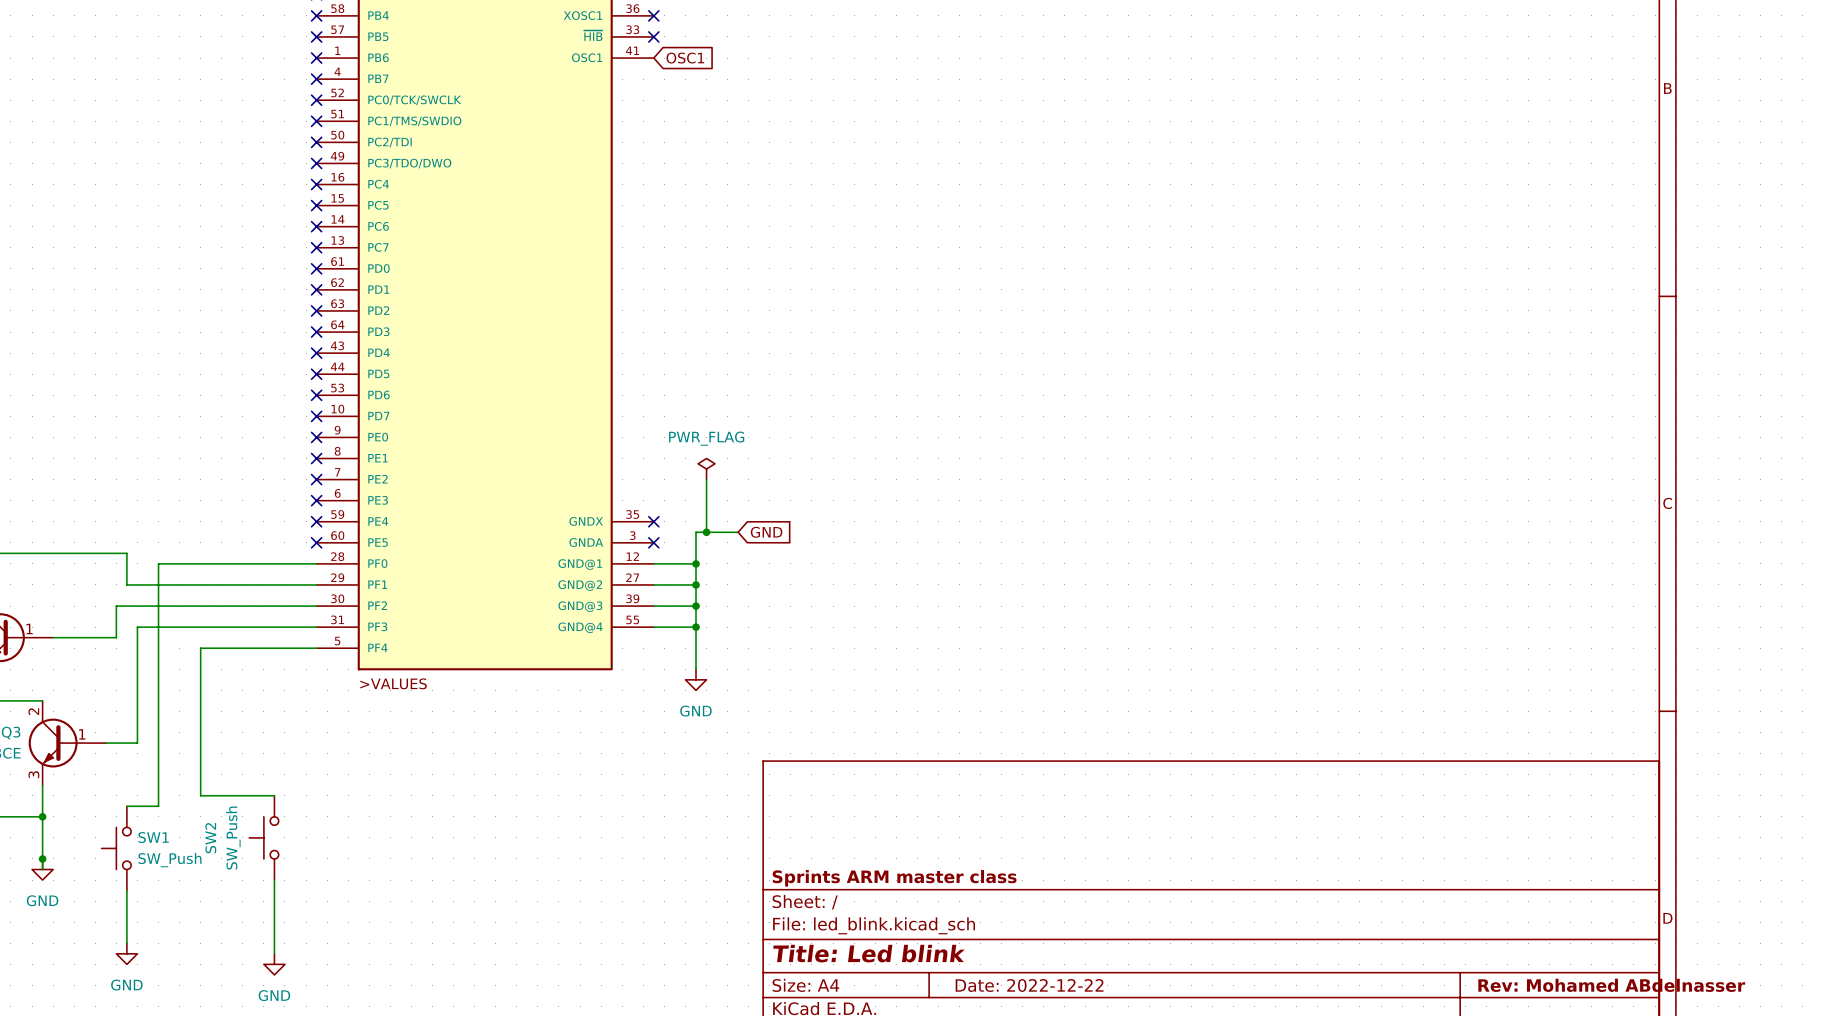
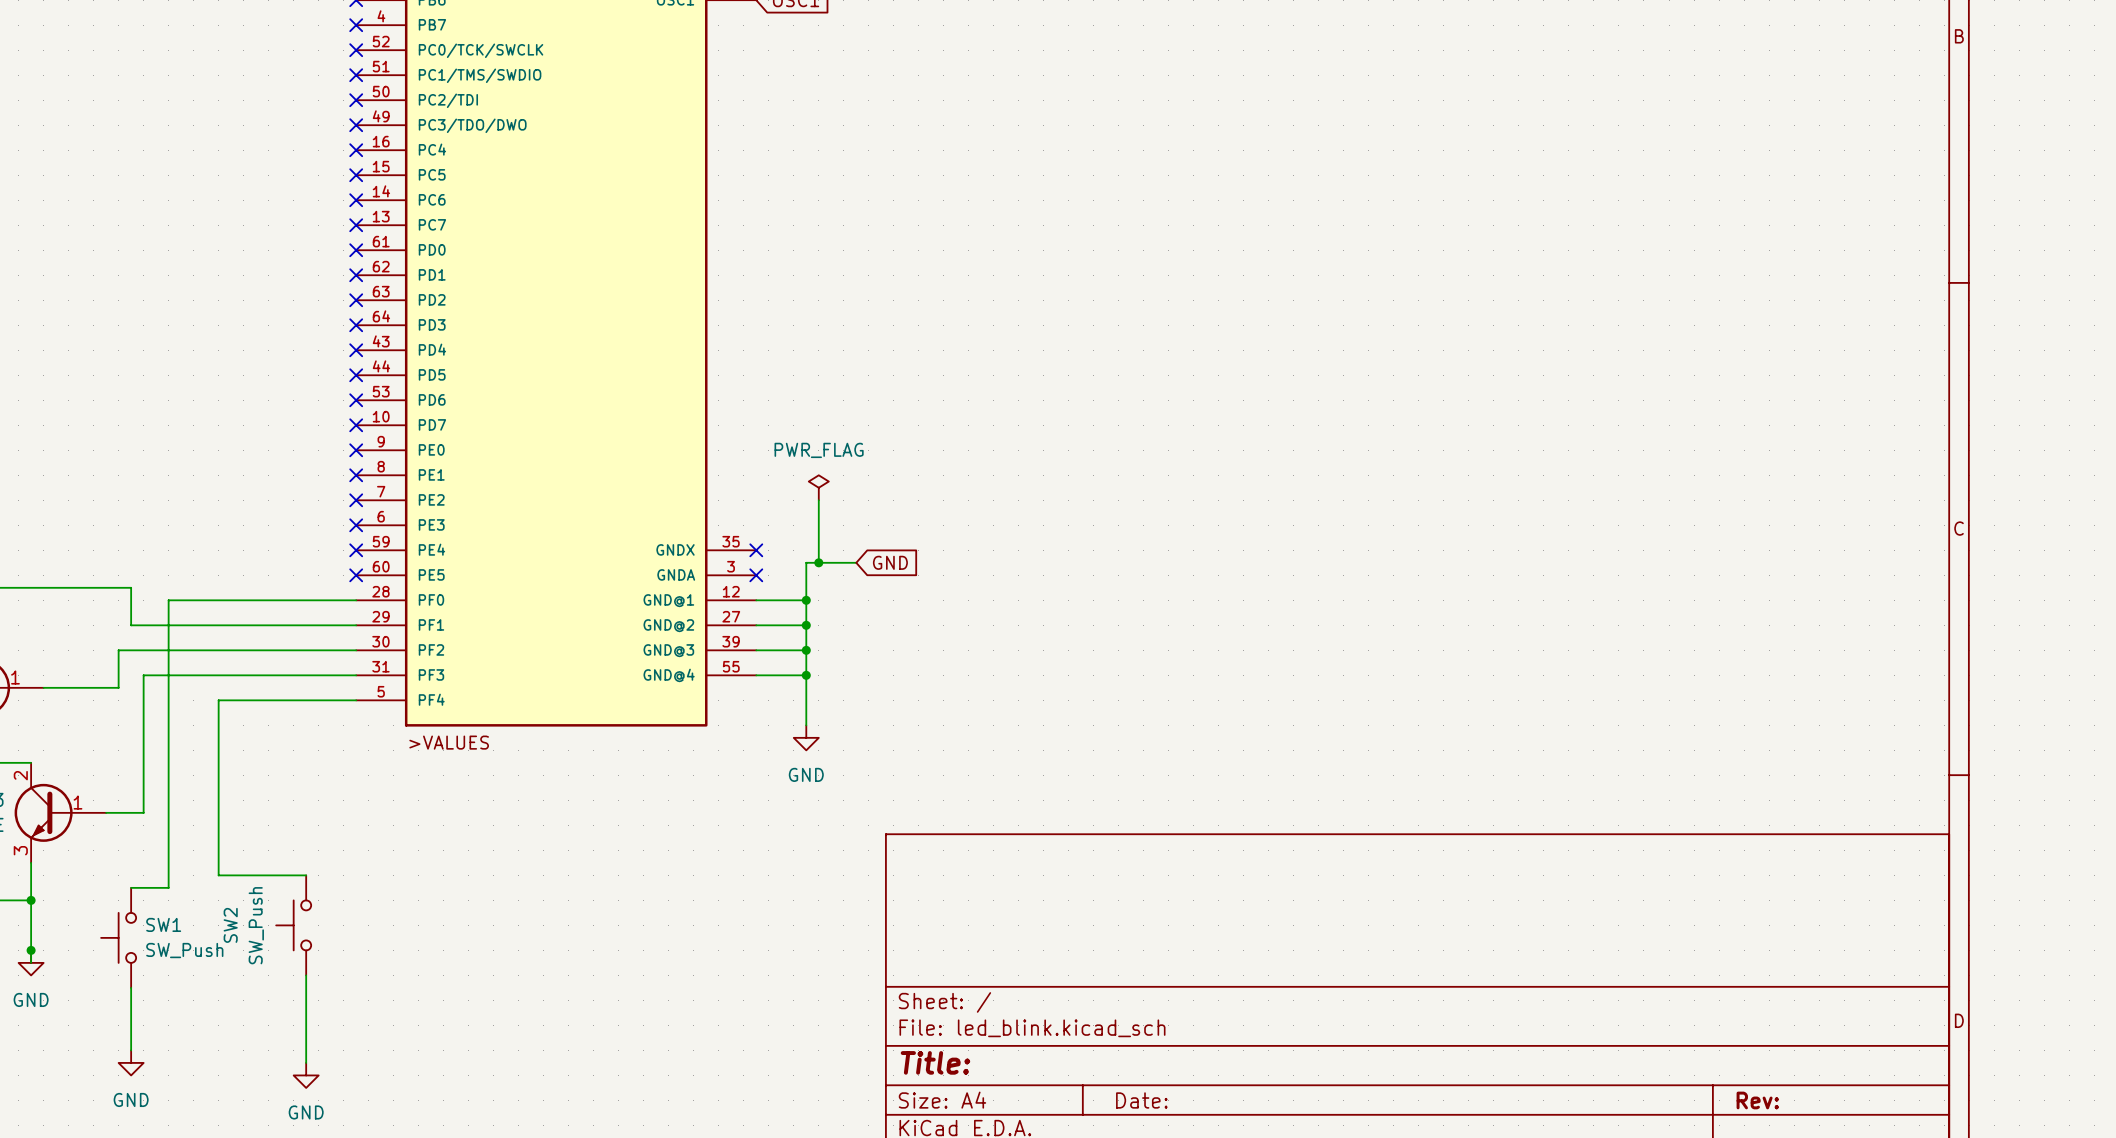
title block: Sprints ARM master class (894, 878) -> none
title block: Title: Led blink (869, 953) -> Title: (935, 1062)
title block: Date: 2022-12-22 (1029, 985) -> Date: (1141, 1100)
title block: Rev: Mohamed ABdelnasser (1611, 985) -> Rev: (1757, 1100)

